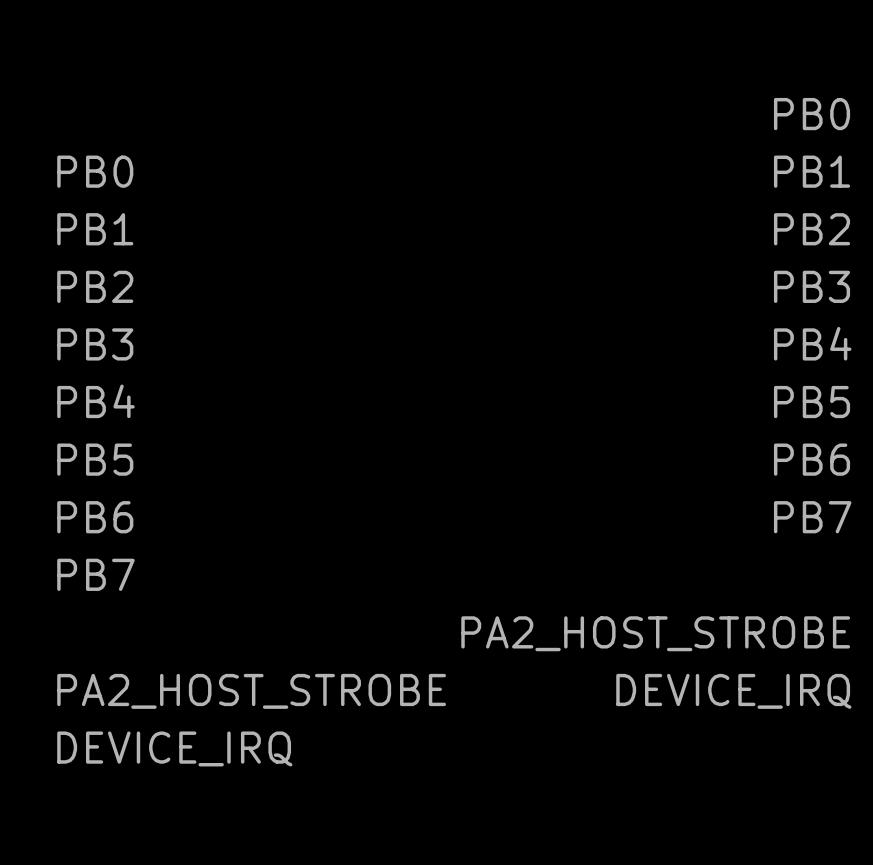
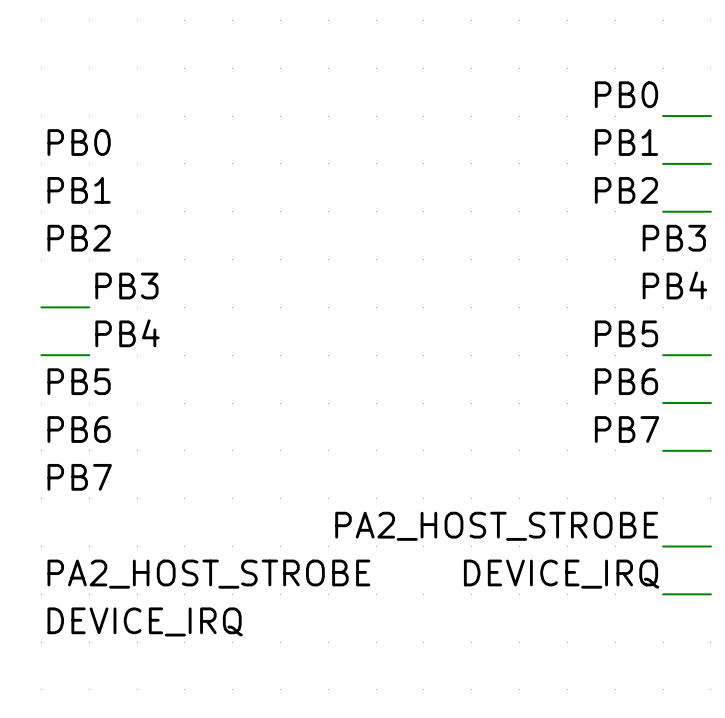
label position: PB0 (812, 114) -> PB0 (626, 94)
wire: none -> (663, 116) (710, 116)
label position: PB1 (812, 171) -> PB1 (626, 142)
wire: none -> (663, 163) (710, 163)
label position: PB2 (812, 229) -> PB2 (626, 190)
wire: none -> (663, 211) (710, 211)
label position: PB3 (95, 344) -> PB3 (126, 286)
wire: none -> (41, 307) (89, 307)
label position: PB4 (95, 401) -> PB4 (127, 333)
label position: PB5 (812, 402) -> PB5 (626, 333)
wire: none -> (41, 355) (89, 355)
wire: none -> (663, 355) (710, 355)
label position: PB6 (812, 459) -> PB6 (626, 381)
wire: none -> (663, 403) (710, 403)
label position: PB7 (812, 517) -> PB7 (627, 429)
wire: none -> (663, 450) (710, 450)
label position: PA2_HOST_STROBE (655, 633) -> PA2_HOST_STROBE (496, 526)
wire: none -> (663, 546) (710, 546)
label position: DEVICE_IRQ (733, 691) -> DEVICE_IRQ (561, 574)
wire: none -> (663, 594) (710, 594)

